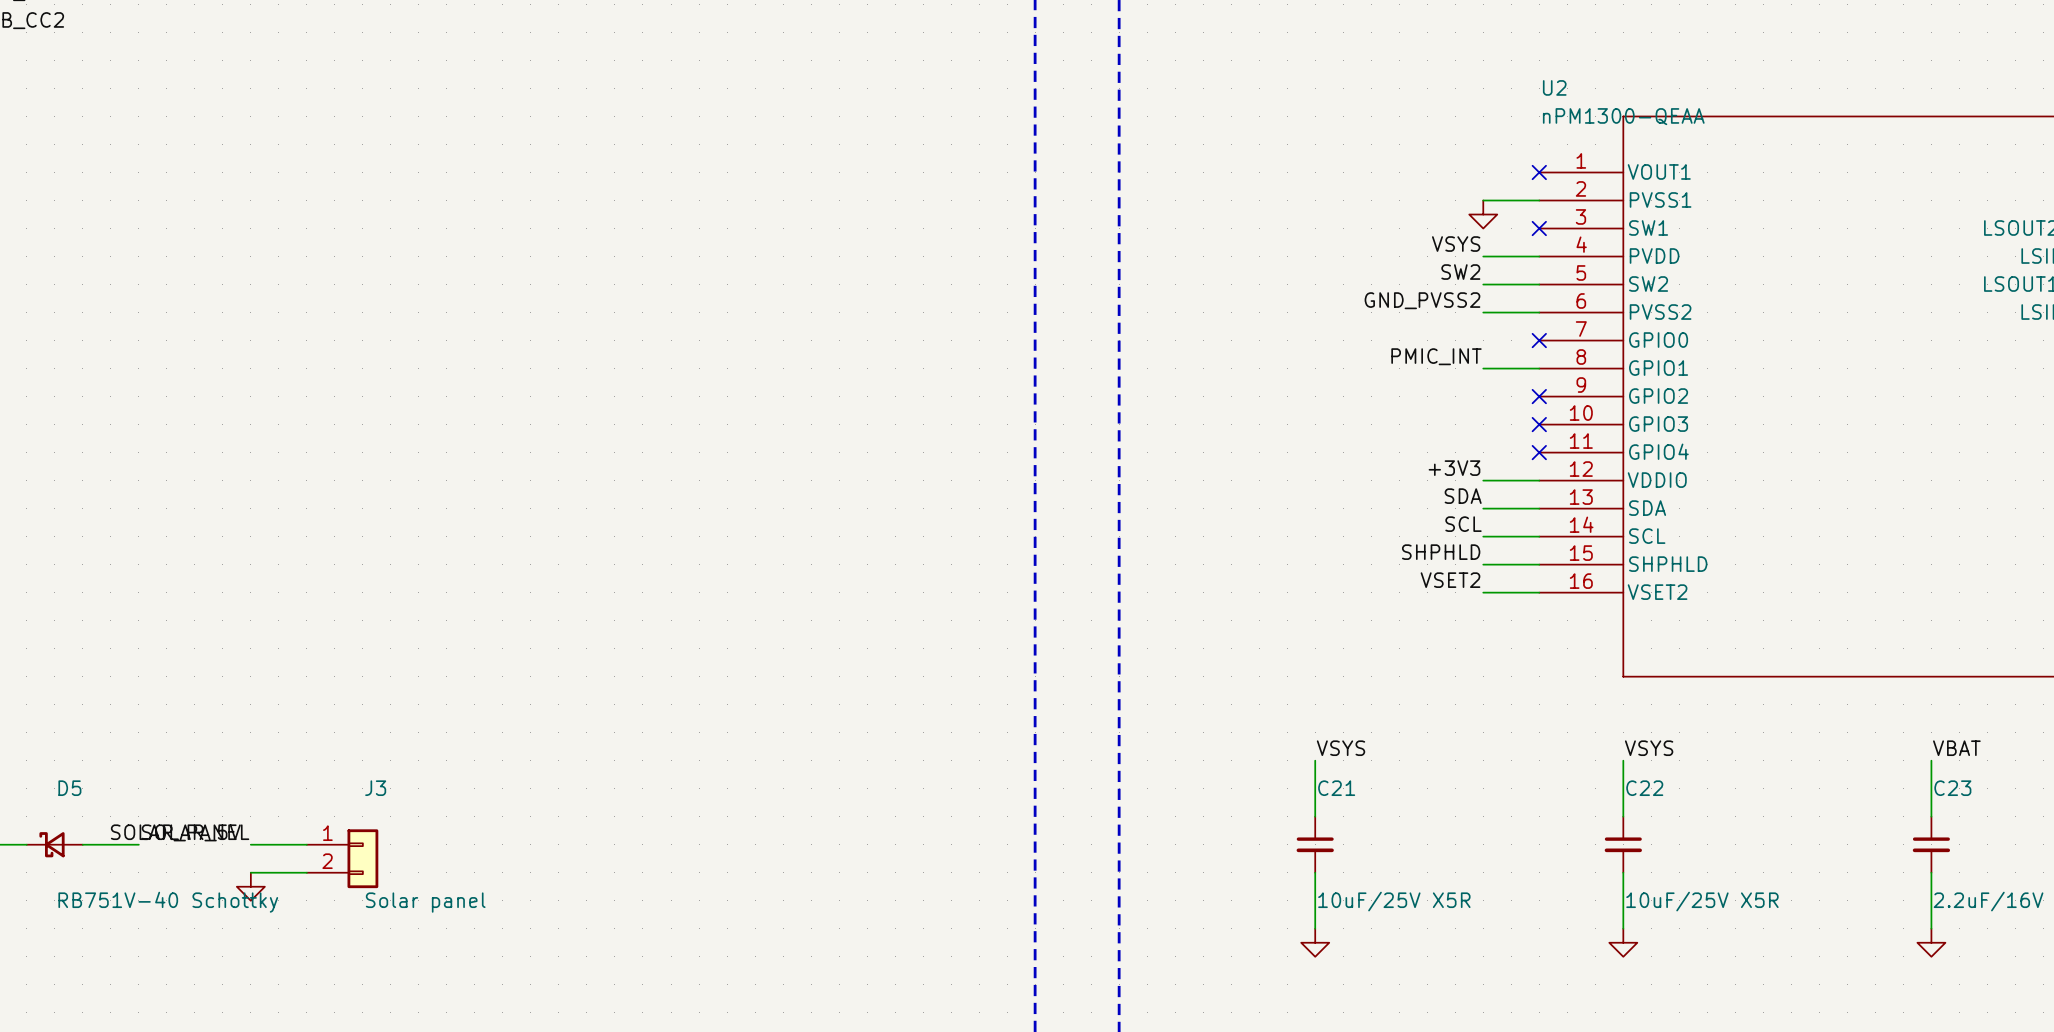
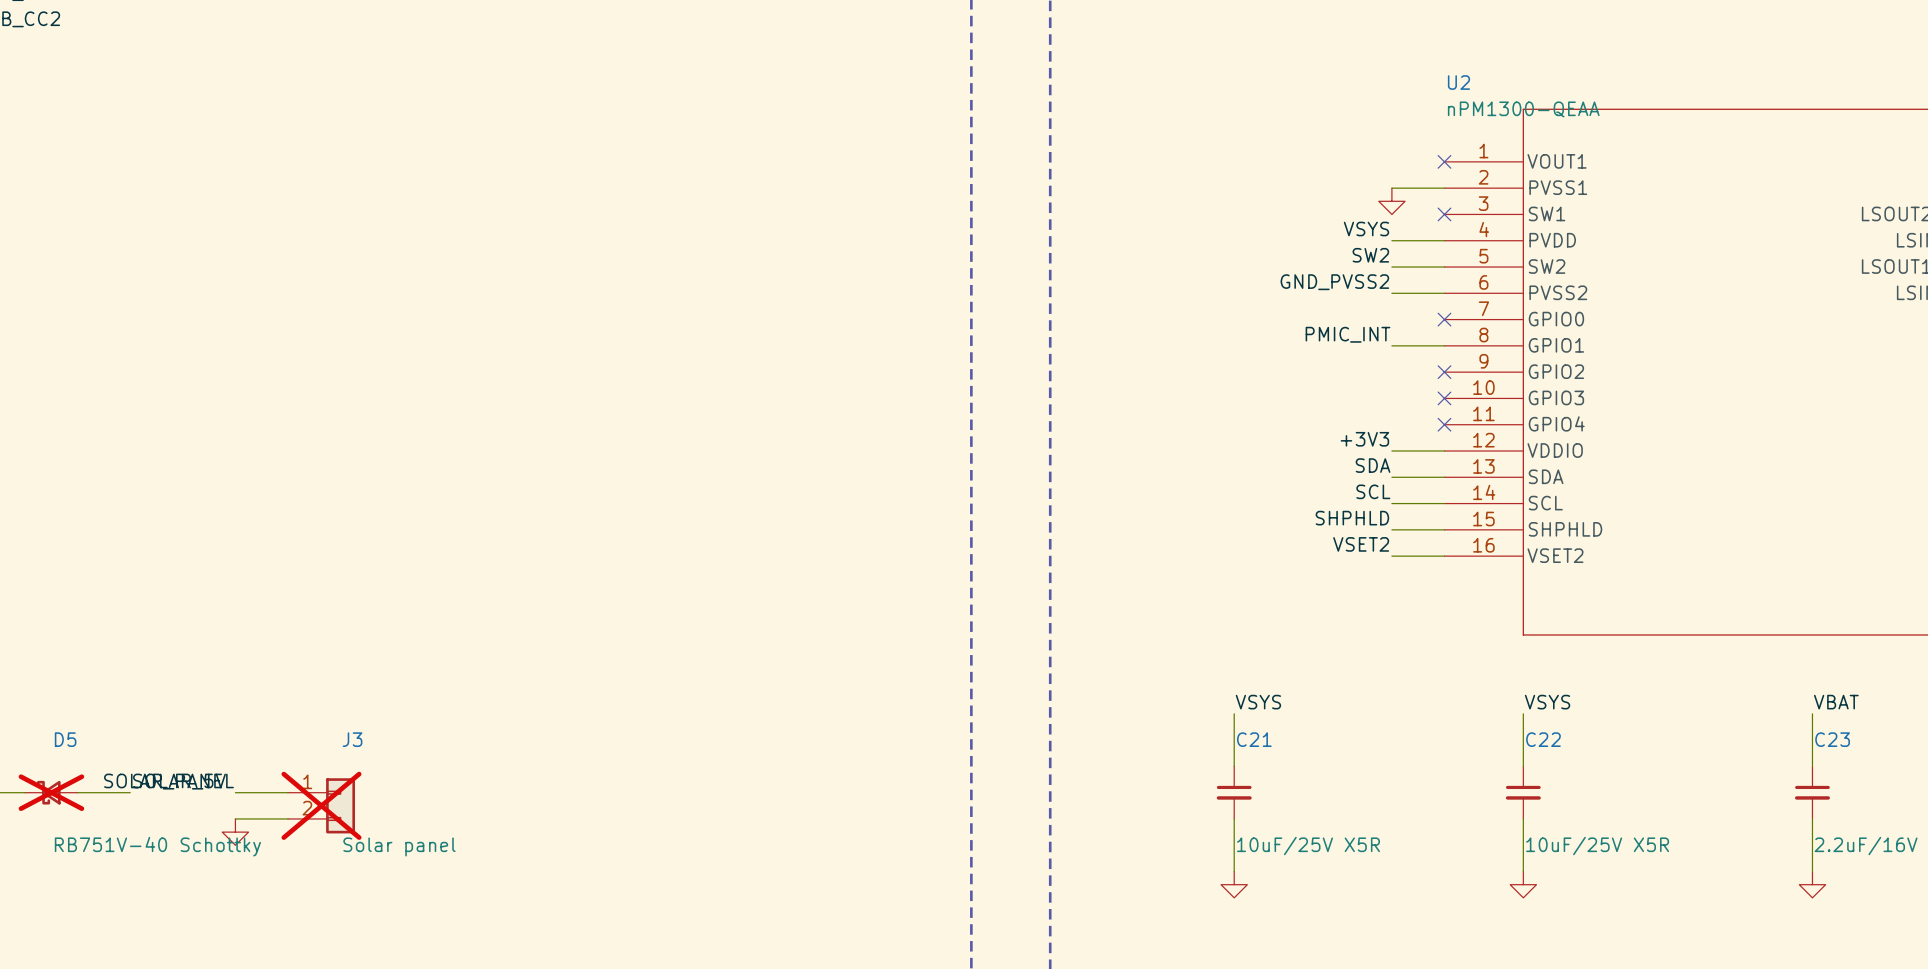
D5 do-not-place cross: none -> (51, 792)
J3 do-not-place cross: none -> (321, 805)

